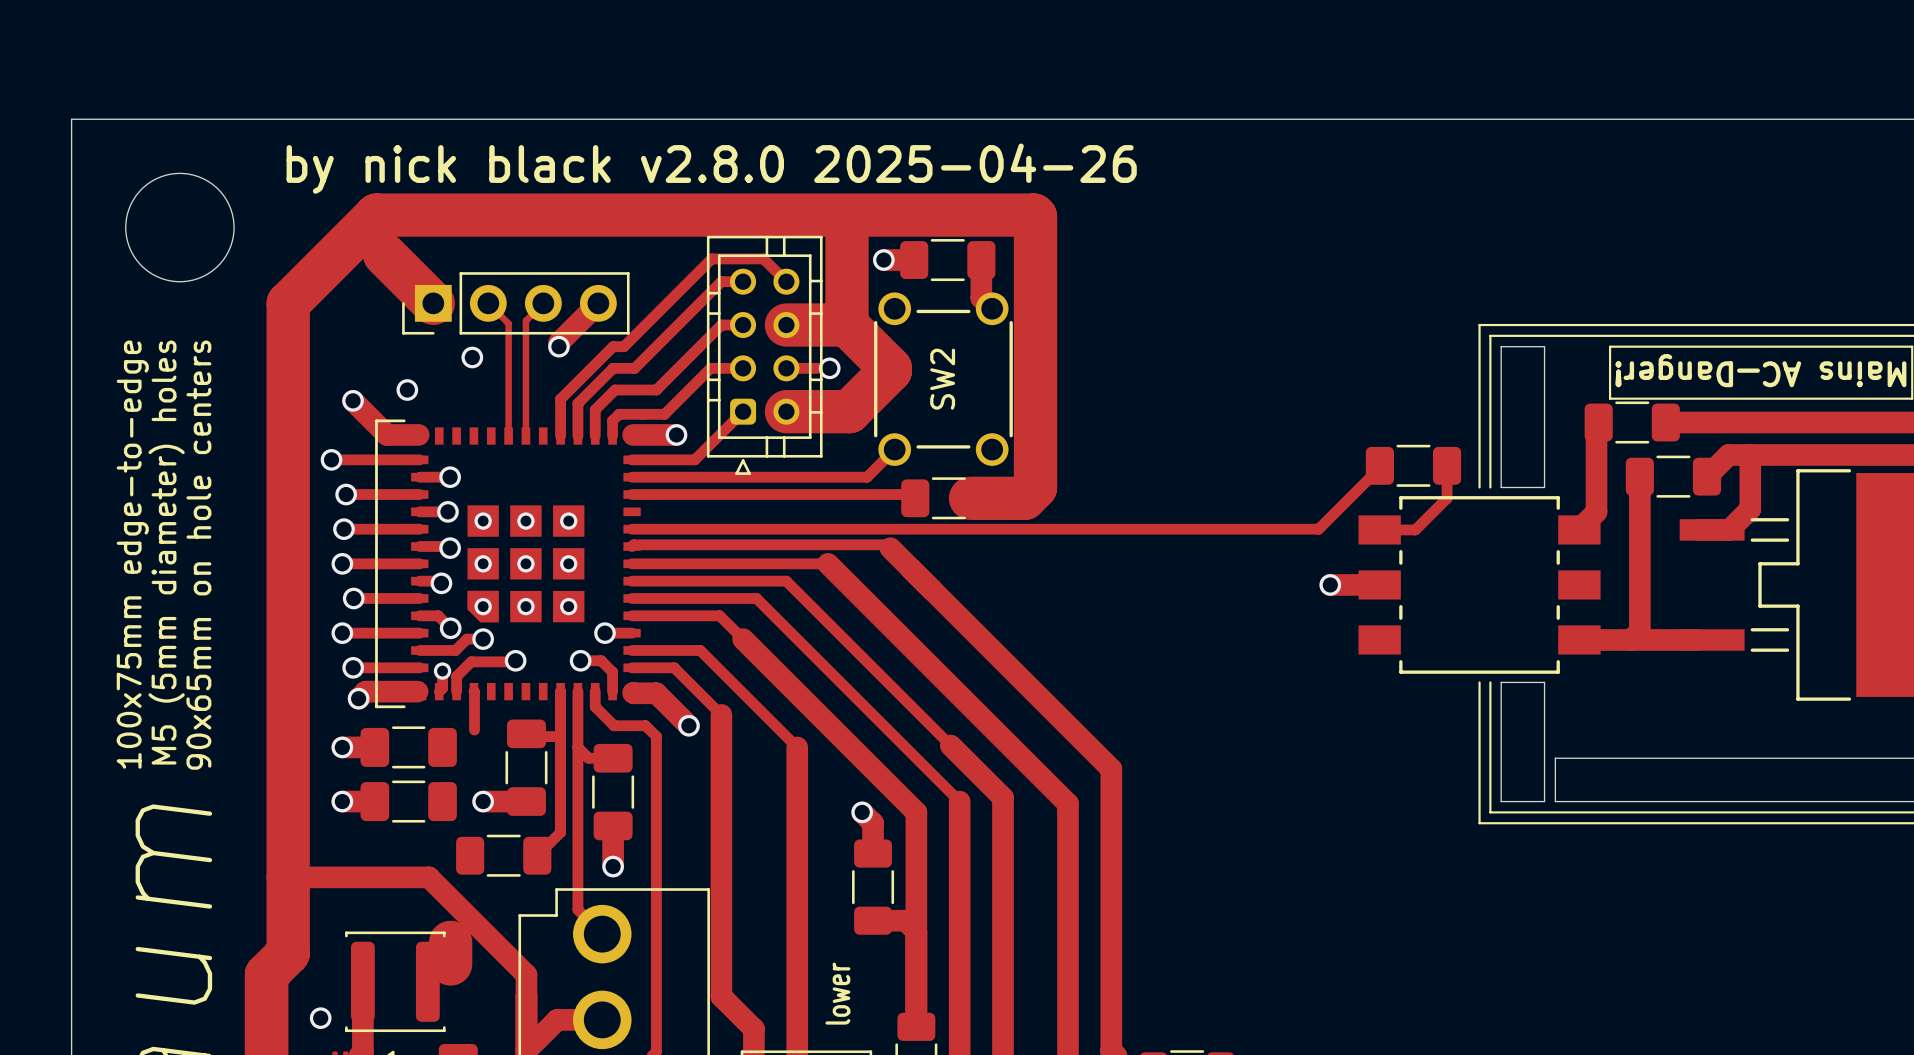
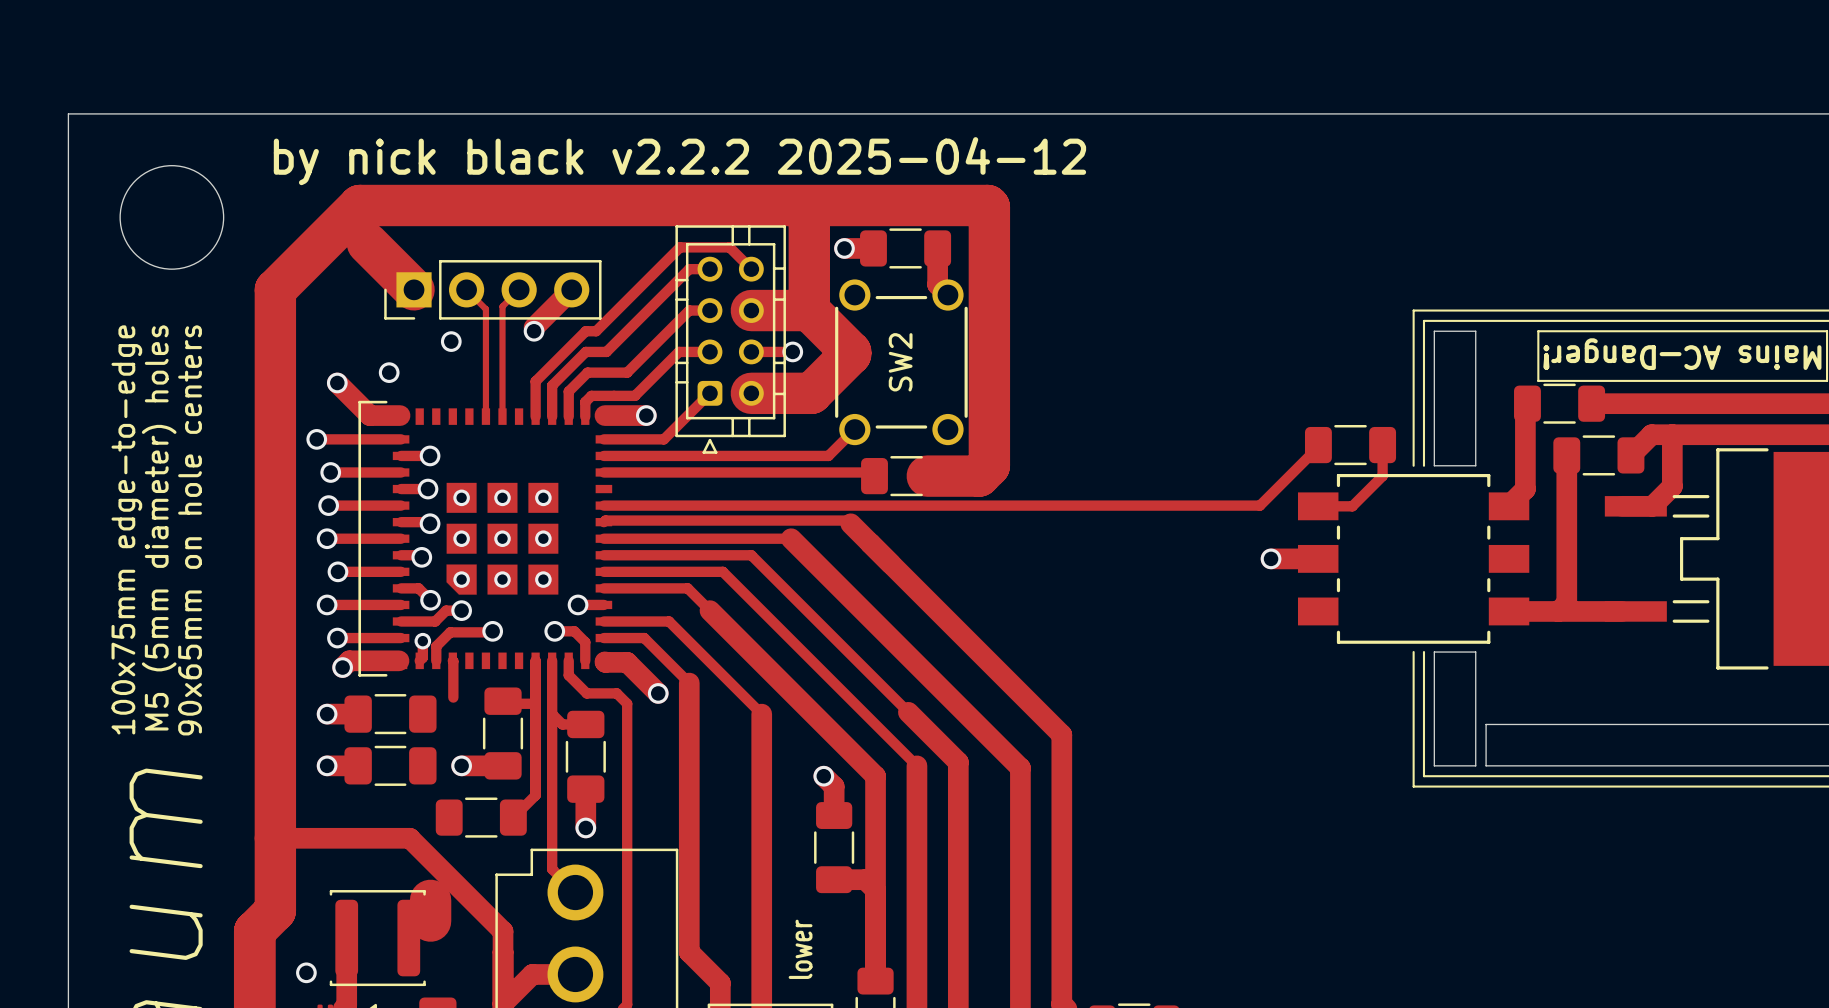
text: by nick black v2.8.0 2025-04-26 (711, 168) -> by nick black v2.2.2 2025-04-12 (679, 161)

